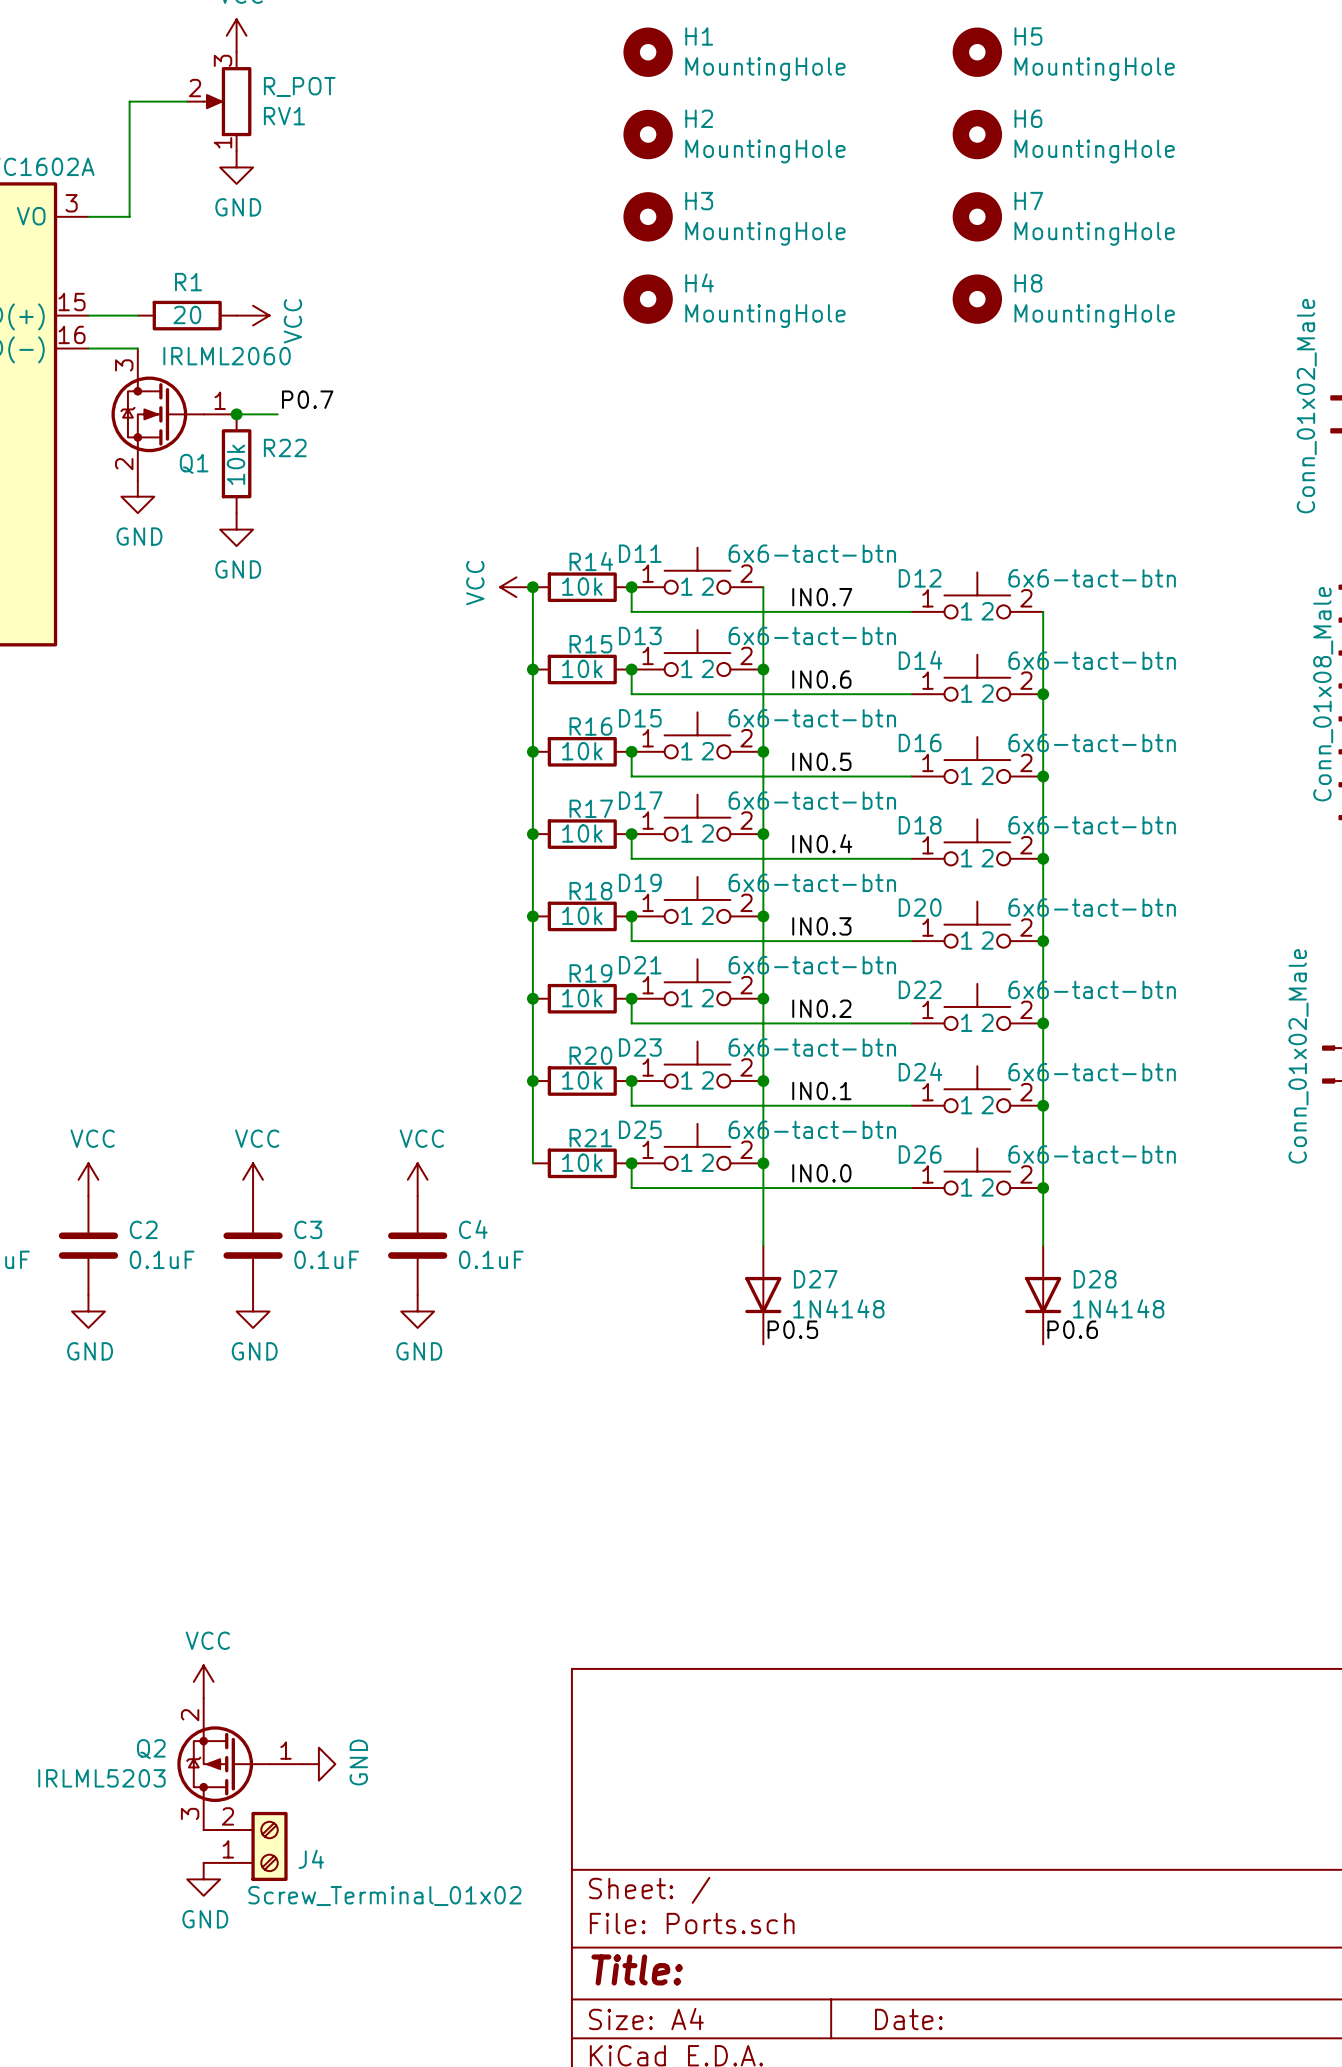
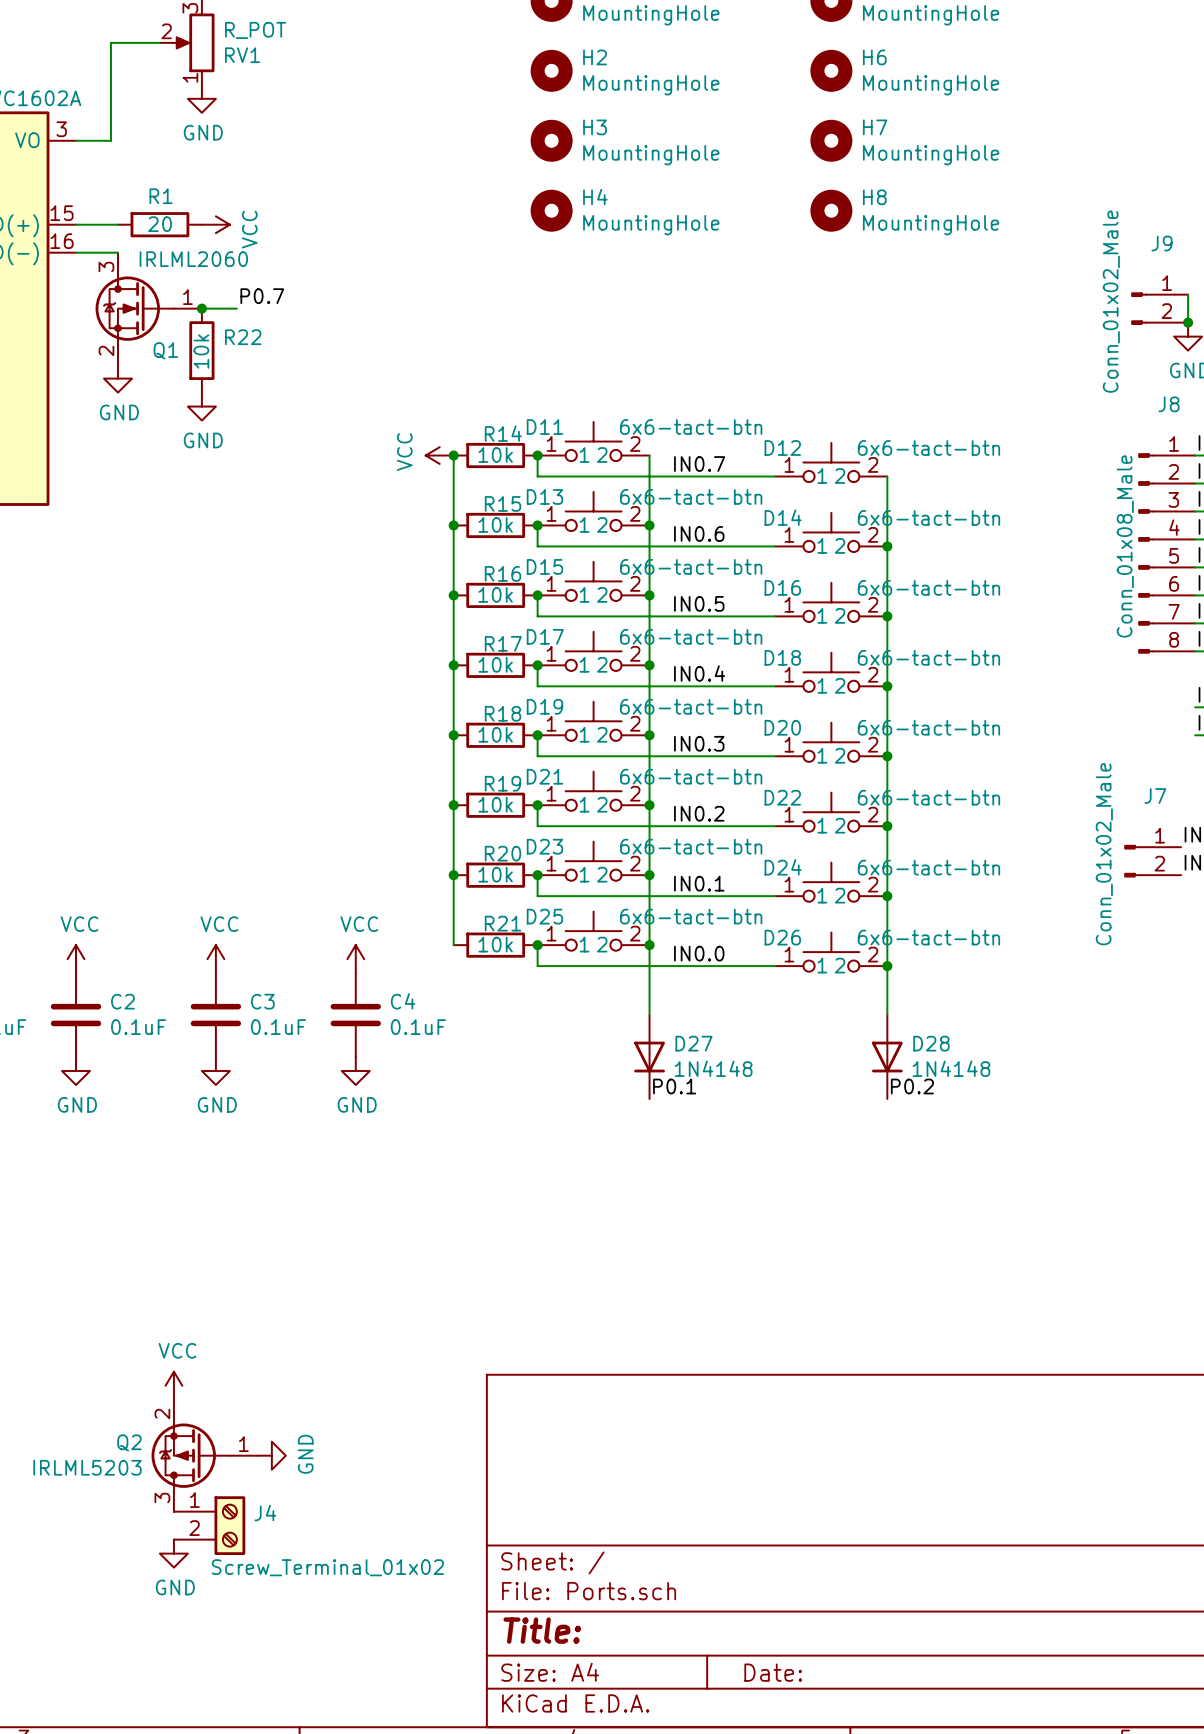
label: P0.5 (792, 1329) -> P0.1 (674, 1086)
label: P0.6 (1072, 1329) -> P0.2 (912, 1086)
J4 flip: as is (269, 1846) -> up-down (229, 1525)

